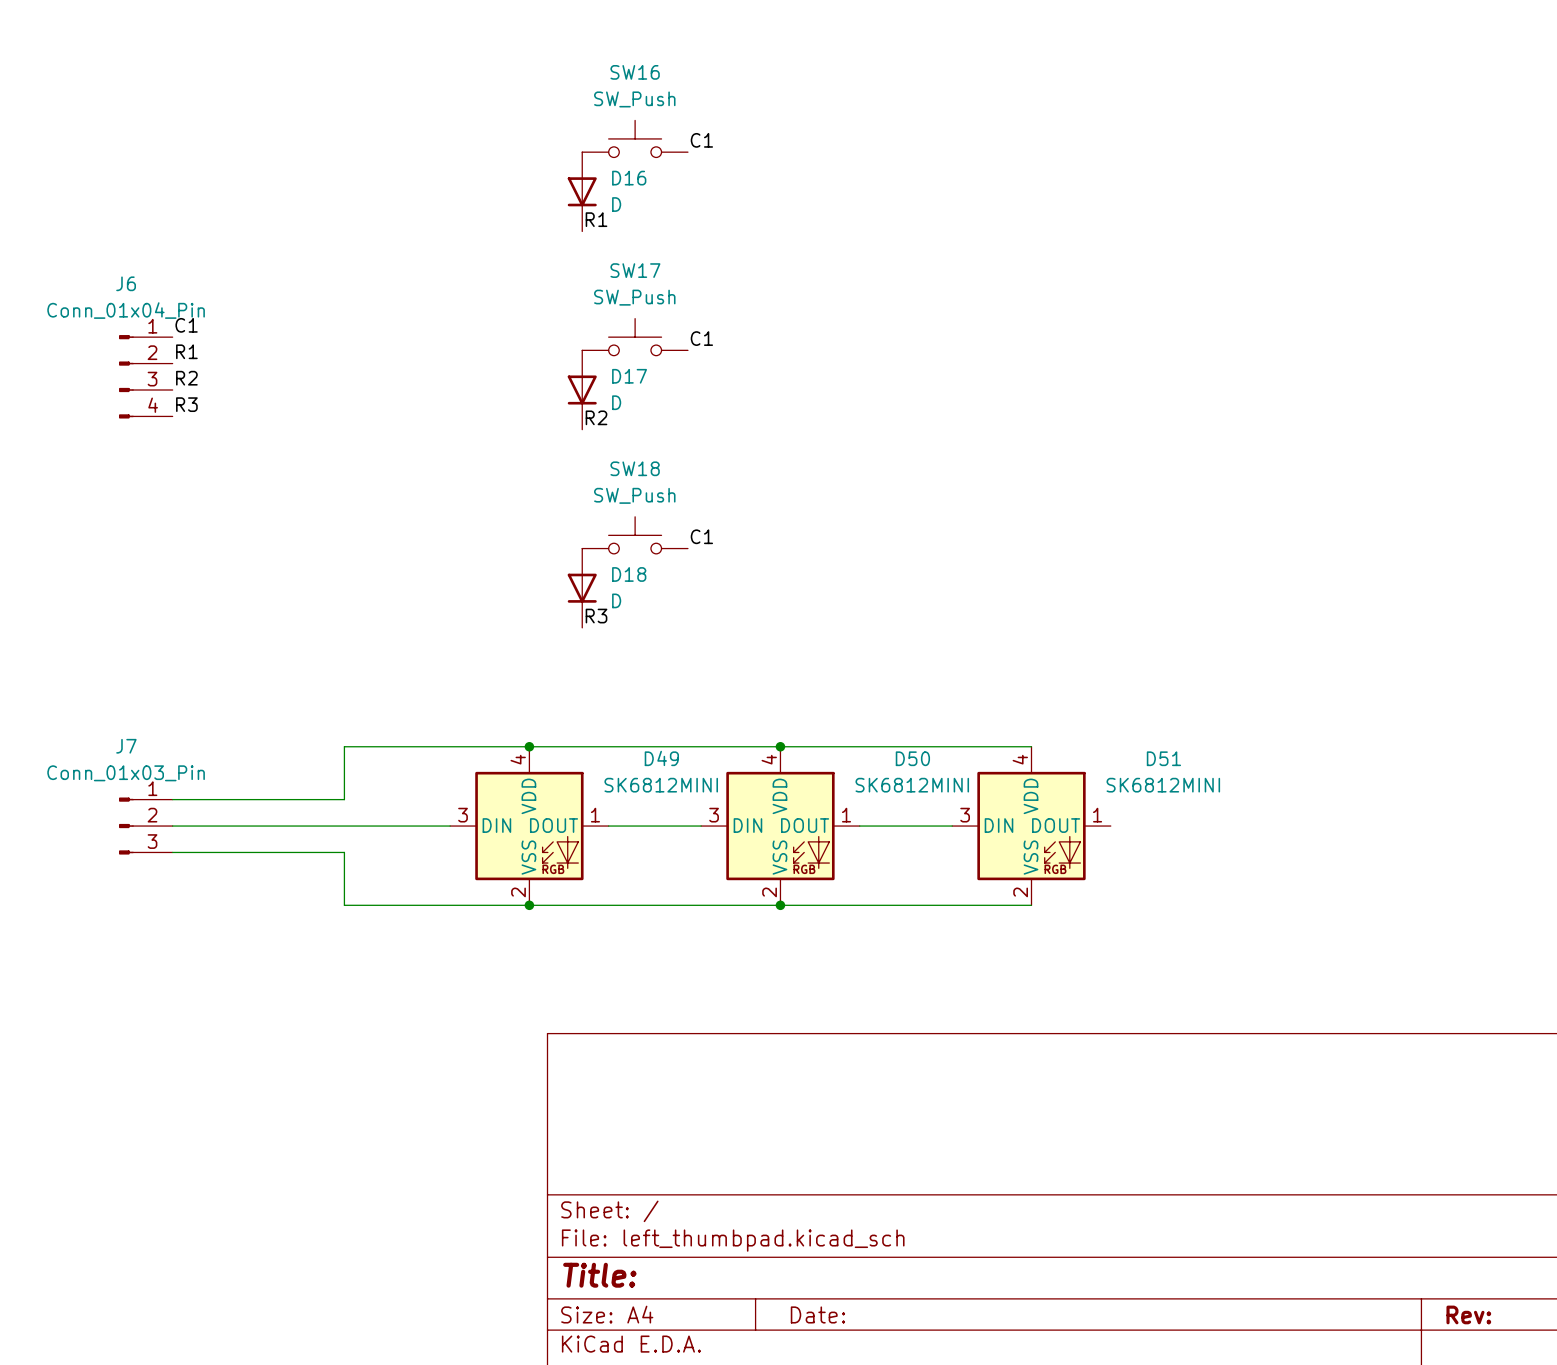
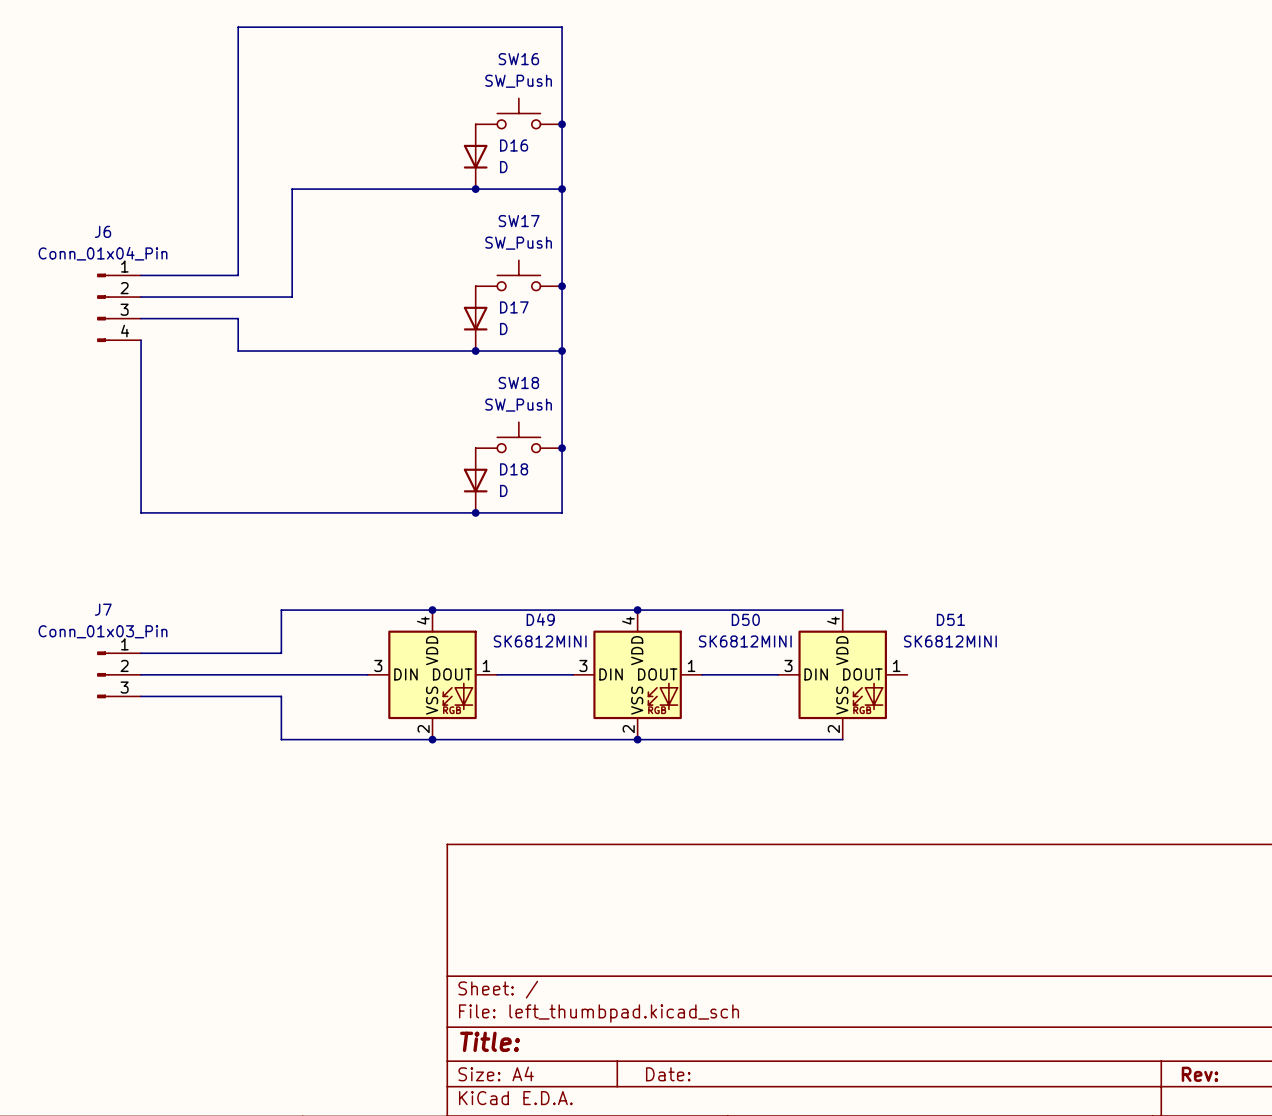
label: C1 (701, 140) -> none
junction: none -> (562, 124)
label: R1 (596, 219) -> none
junction: none -> (475, 189)
wire: none -> (562, 189) (292, 189) (292, 297) (141, 297)
junction: none -> (562, 189)
label: C1 (186, 325) -> none
wire: none -> (141, 275) (238, 275) (238, 27) (562, 27) (562, 512) (141, 512) (141, 340)
label: C1 (701, 338) -> none
junction: none -> (562, 286)
label: R1 (186, 351) -> none
label: R2 (186, 378) -> none
wire: none -> (141, 318) (238, 318) (238, 351) (562, 351)
label: R3 (186, 404) -> none
label: R2 (596, 417) -> none
junction: none -> (475, 351)
junction: none -> (562, 351)
label: C1 (701, 536) -> none
junction: none -> (562, 448)
label: R3 (596, 616) -> none
junction: none -> (475, 512)

